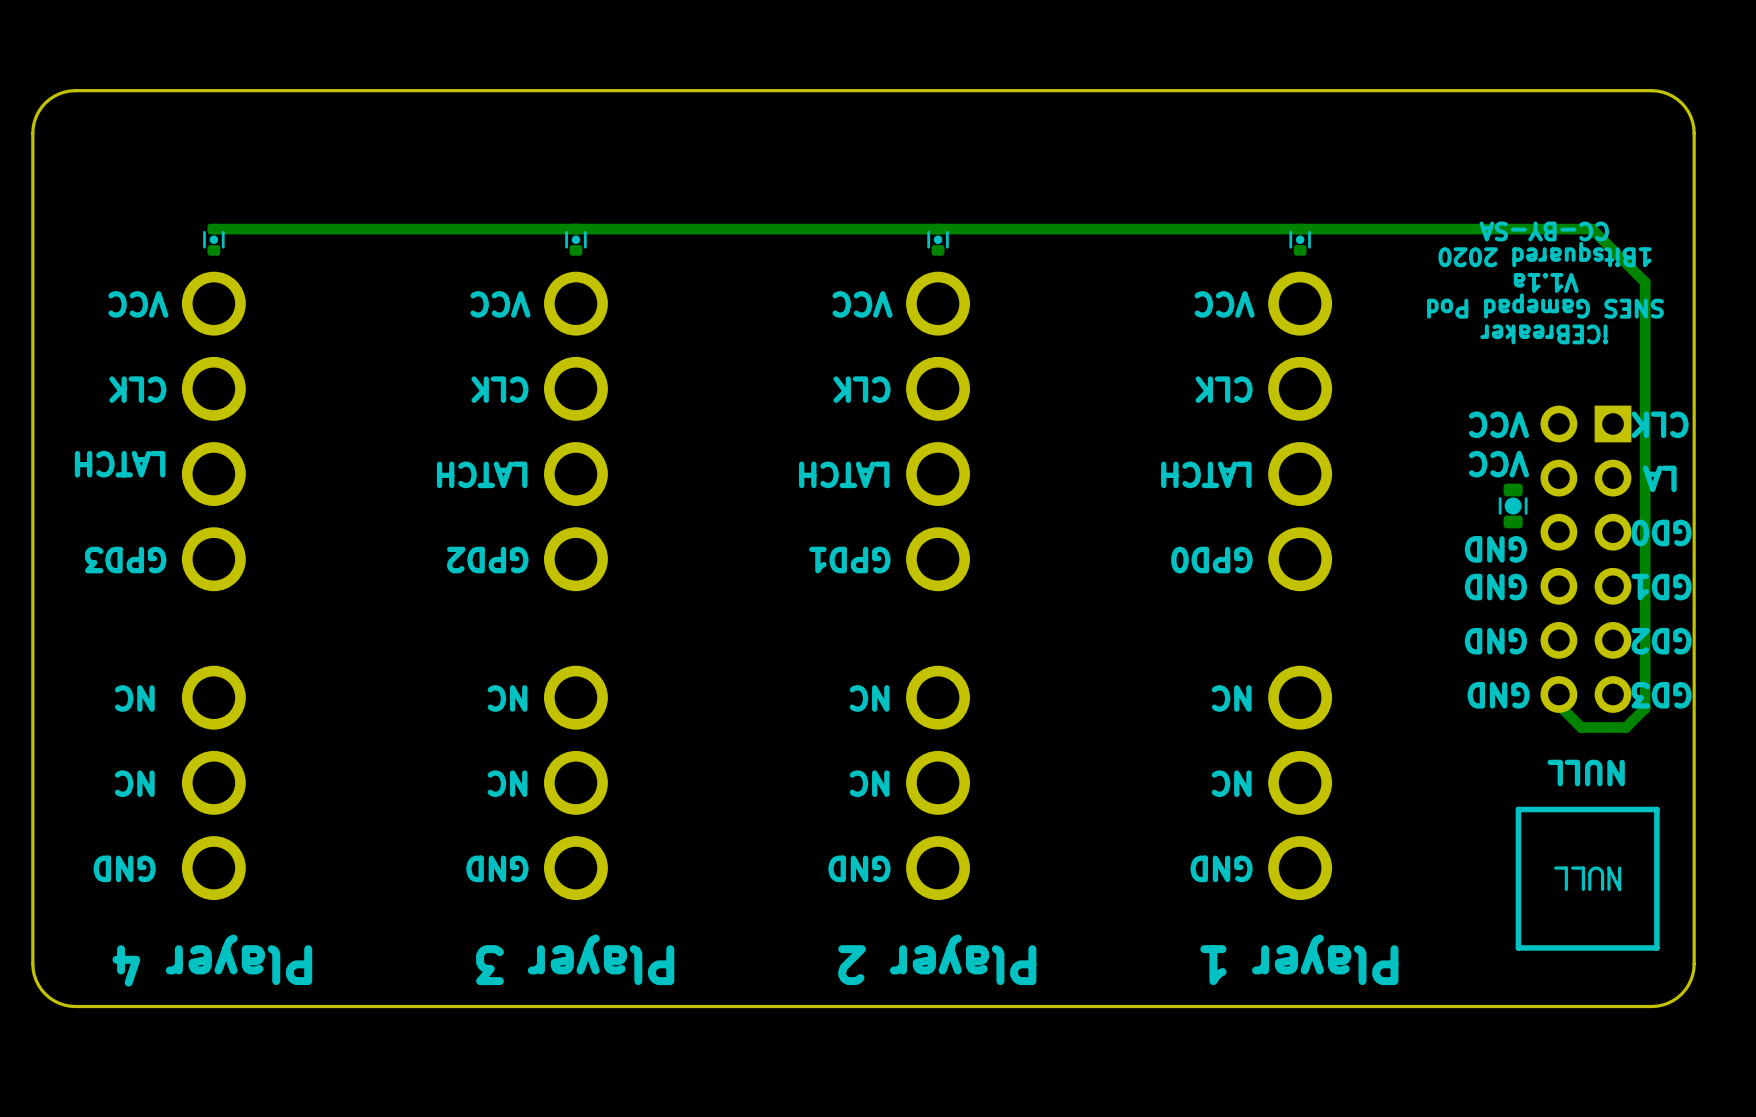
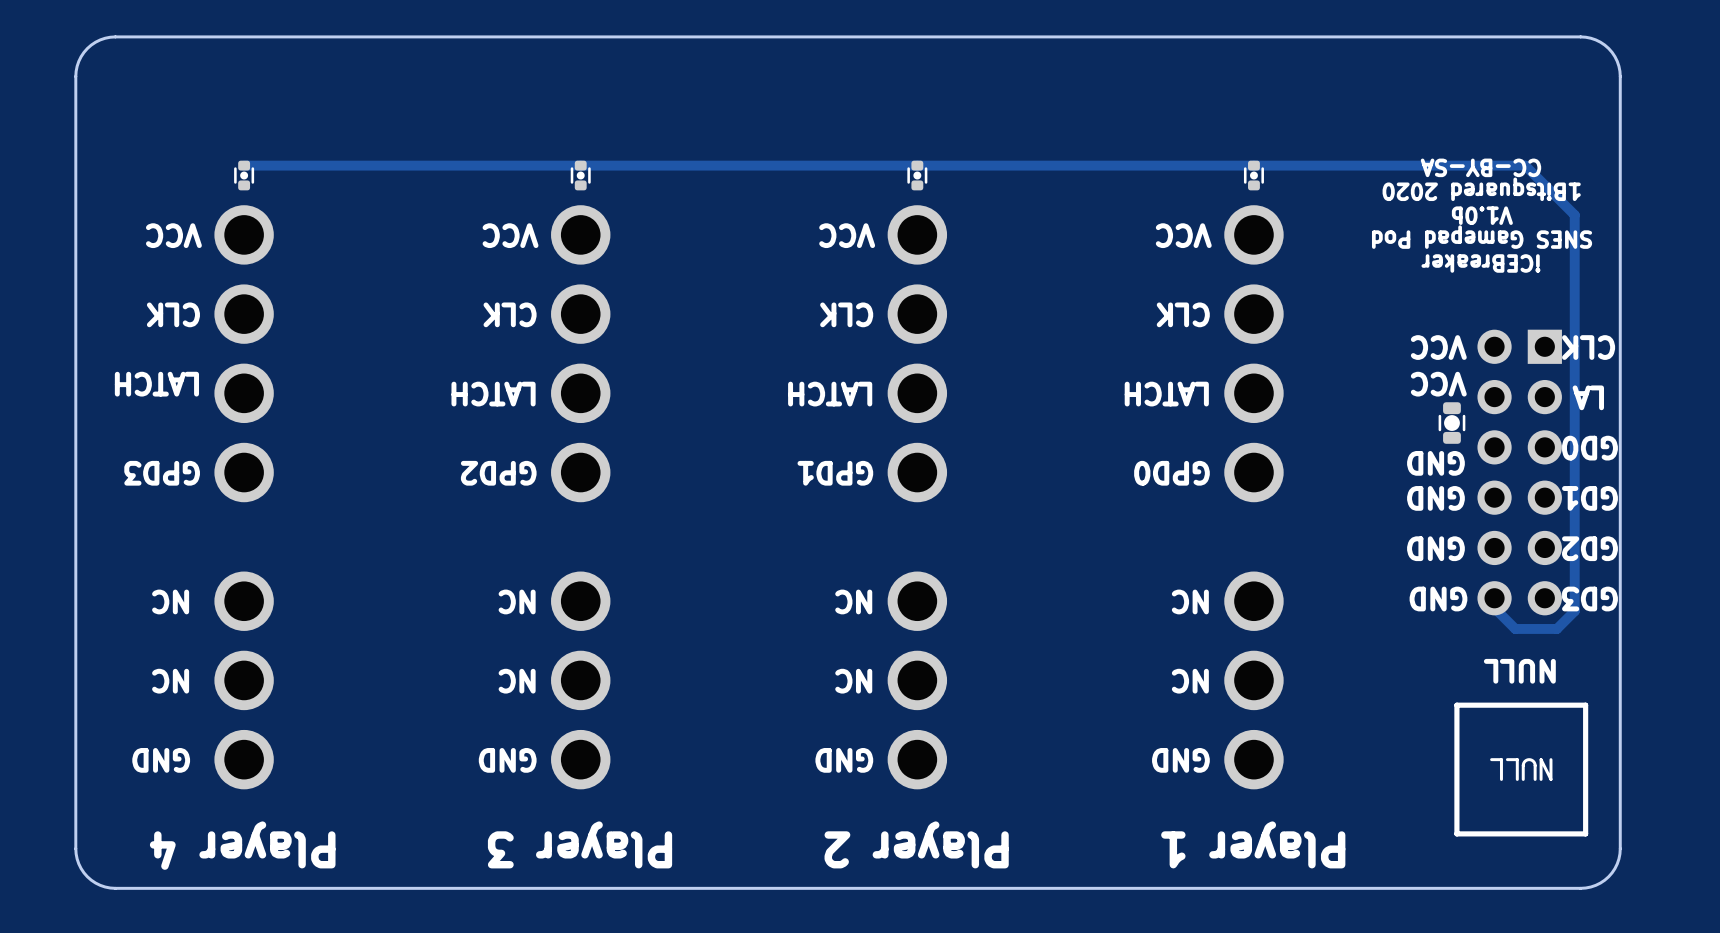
text: V1.1a (1546, 282) -> V1.0b (1482, 215)

